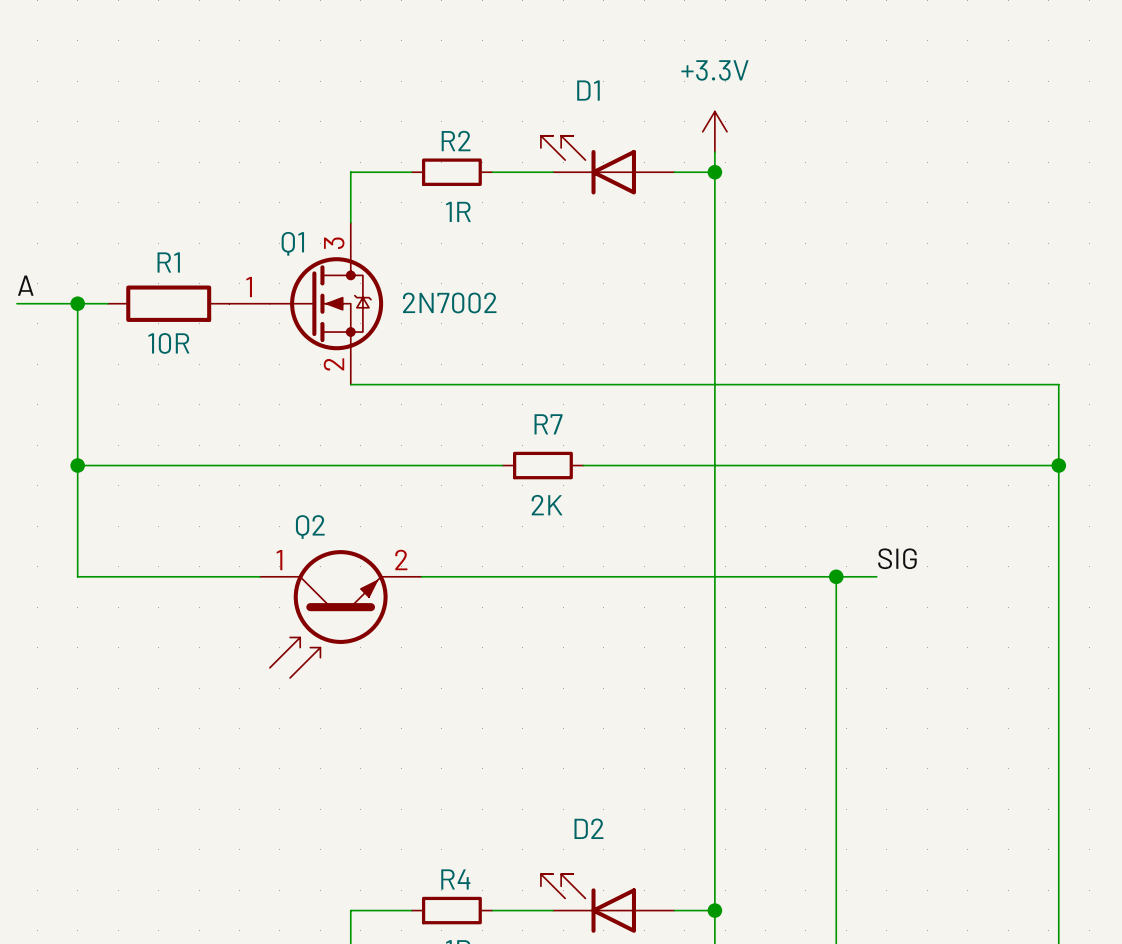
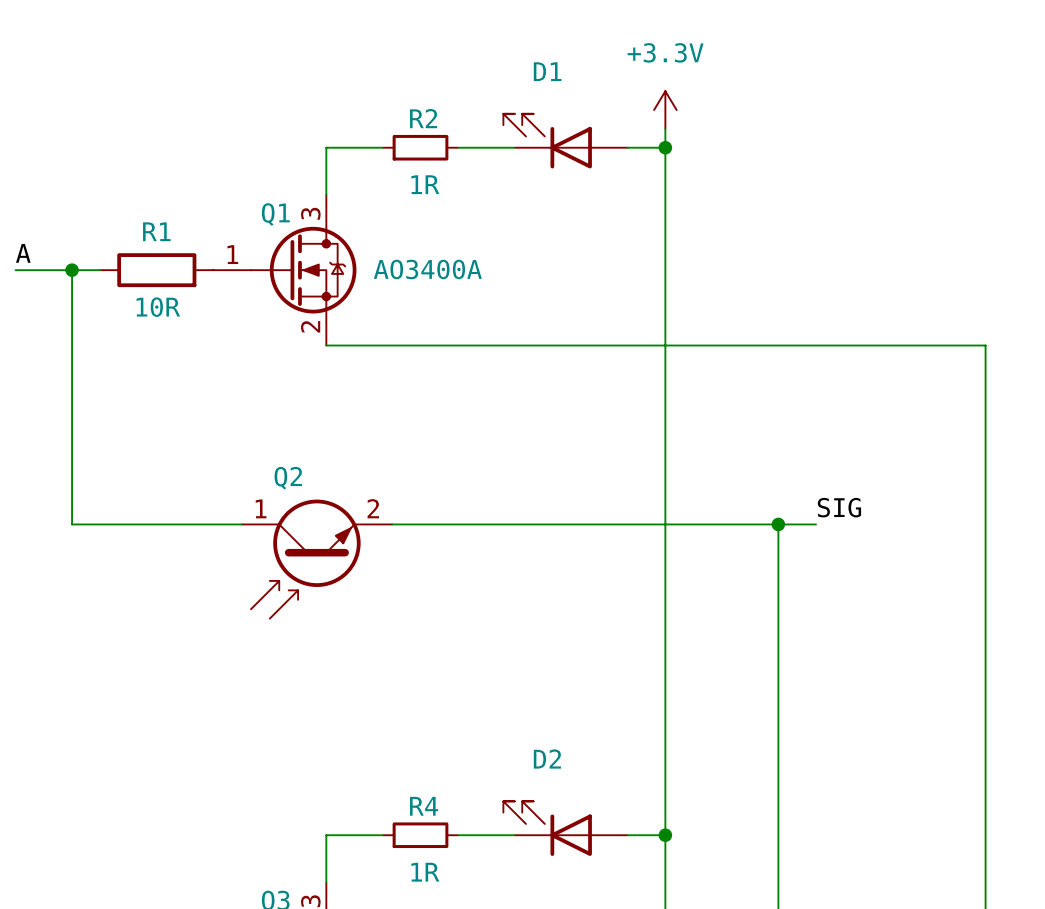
Q1 value: 2N7002 (449, 302) -> AO3400A (427, 269)
wire: (77, 465) (502, 465) -> none
junction: (77, 465) -> none
R7: 2K (542, 465) -> none
wire: (583, 465) (1058, 465) -> none
junction: (1058, 465) -> none

